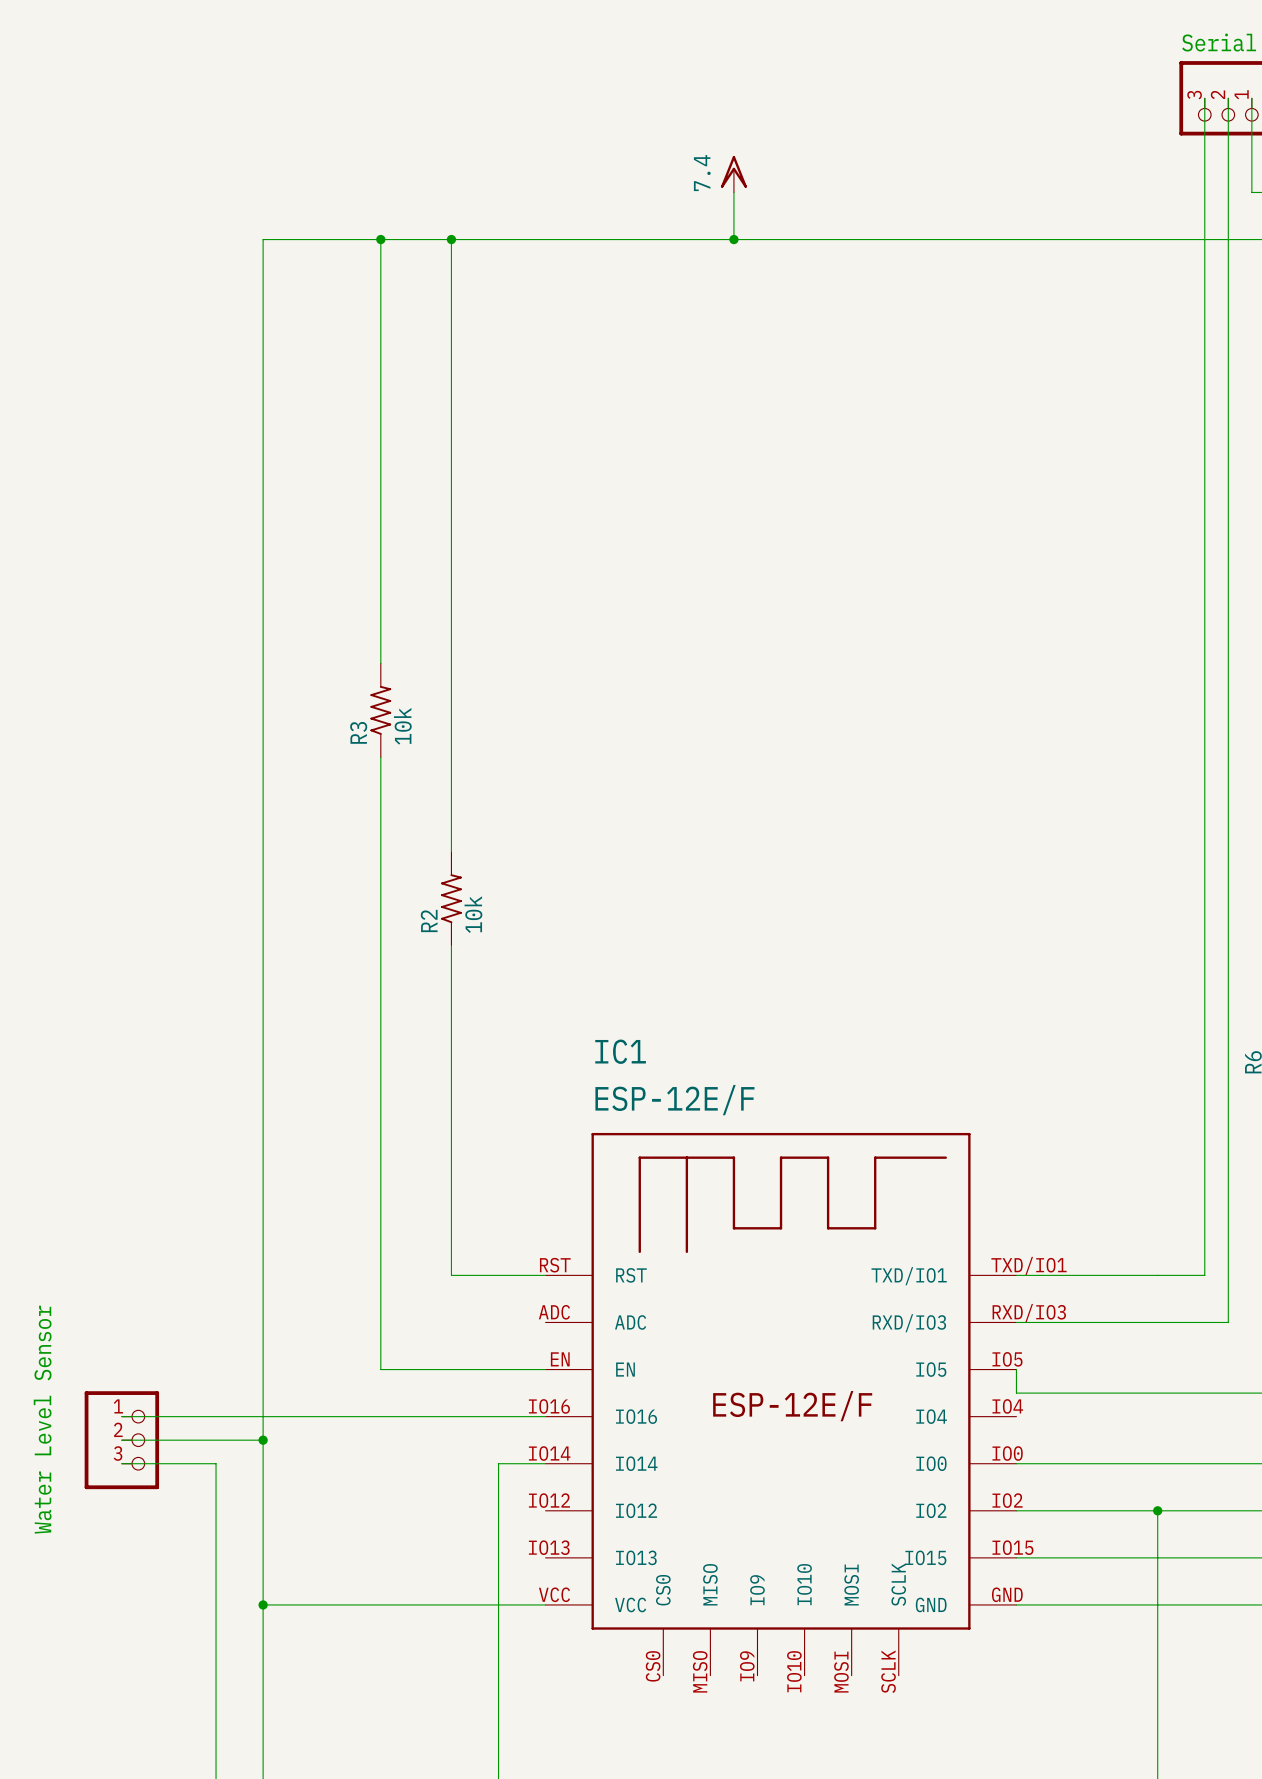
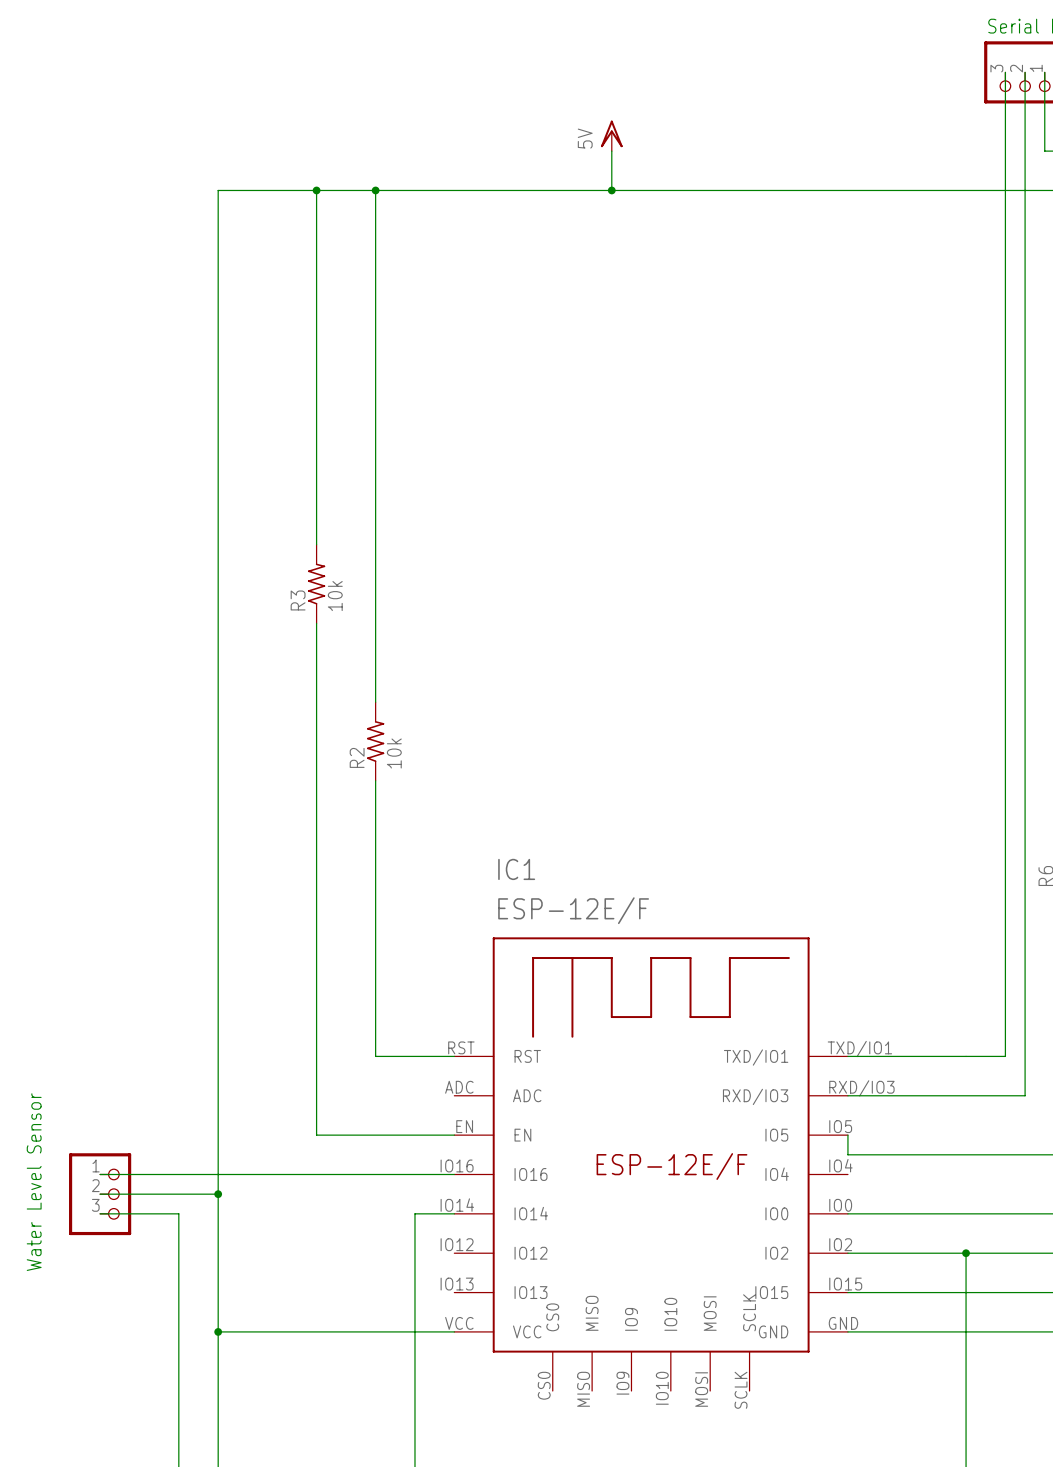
power symbol: 7.4 (733, 174) -> 5V (611, 135)

